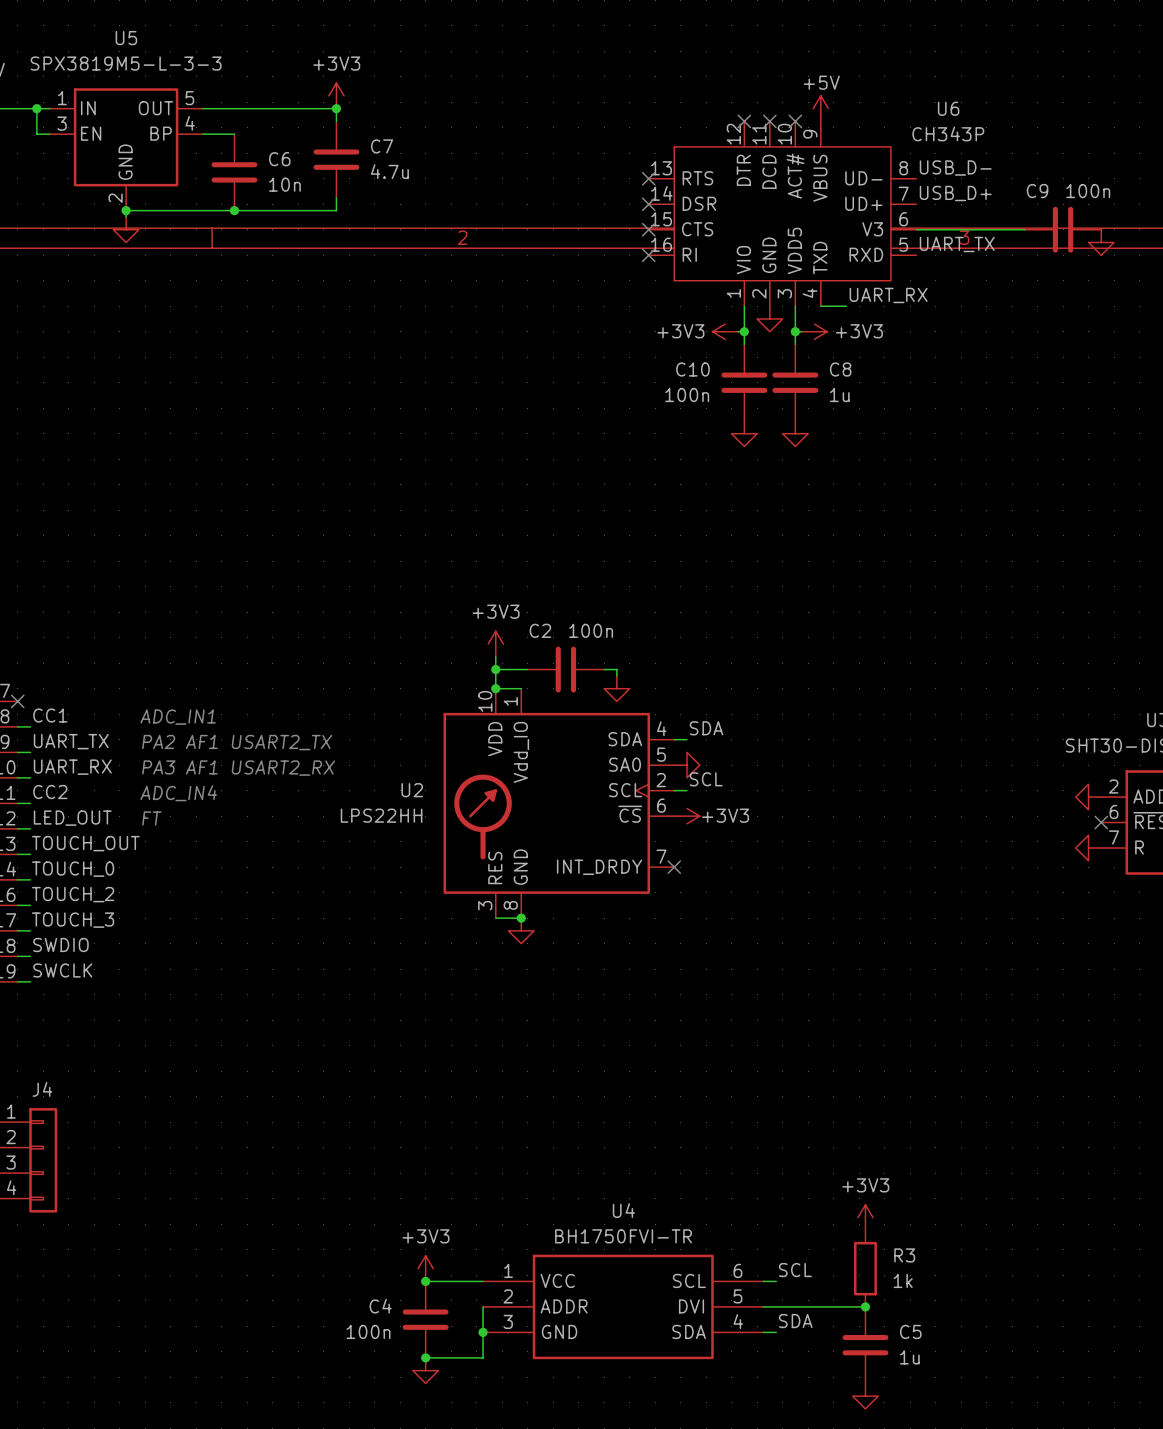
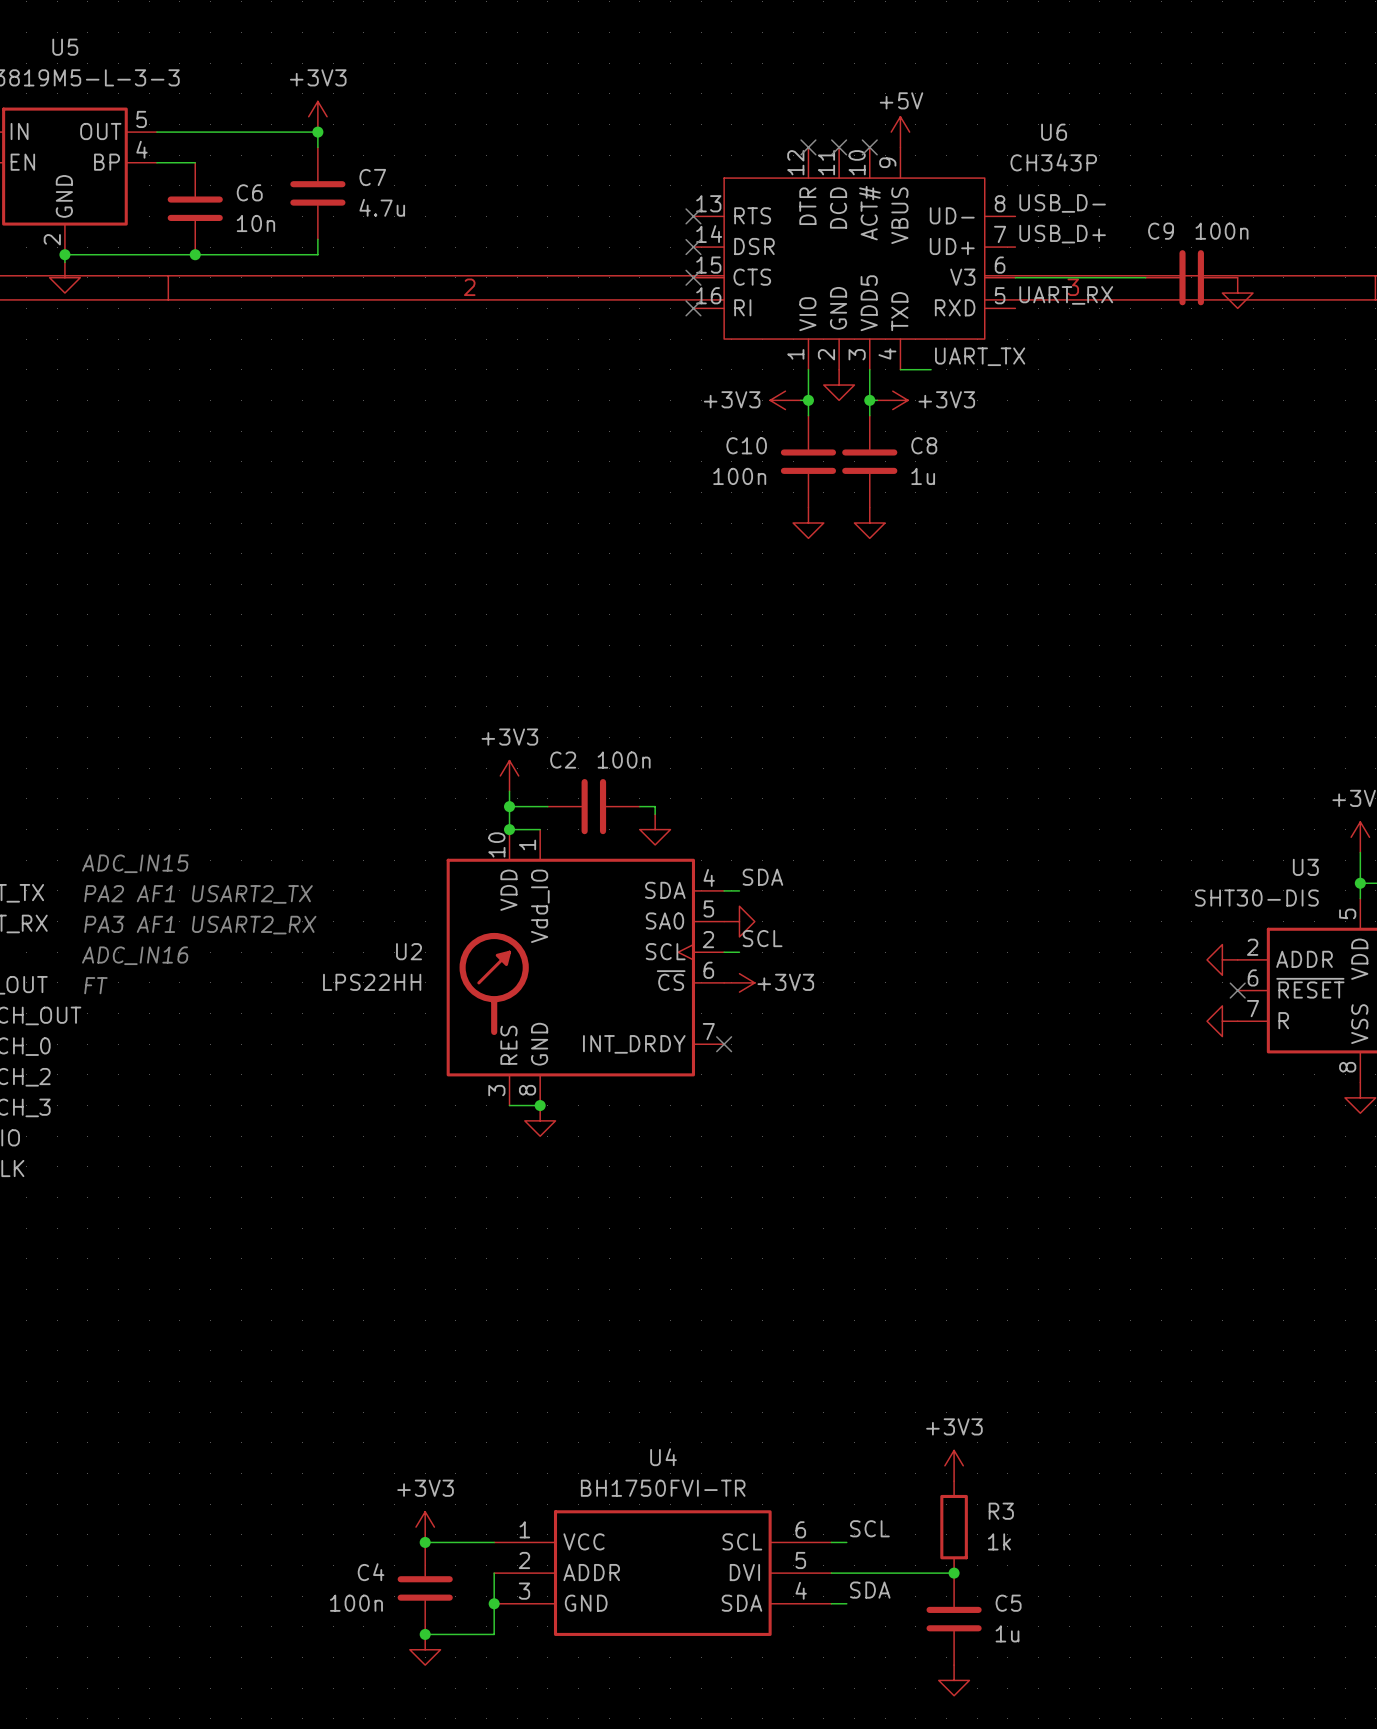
label: UART_TX (957, 244) -> UART_RX (1066, 295)
label: UART_RX (888, 295) -> UART_TX (980, 356)
text: ADC_IN1 (178, 717) -> ADC_IN15 (135, 863)
text: ADC_IN4 (178, 793) -> ADC_IN16 (135, 955)

